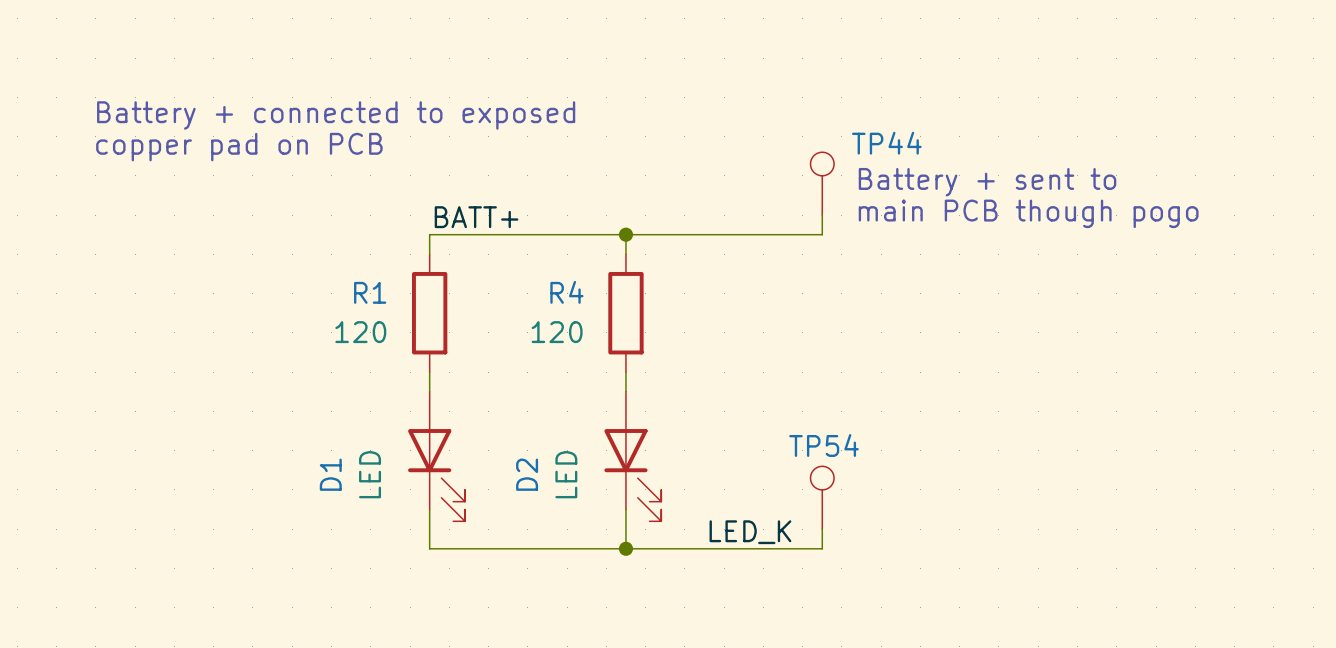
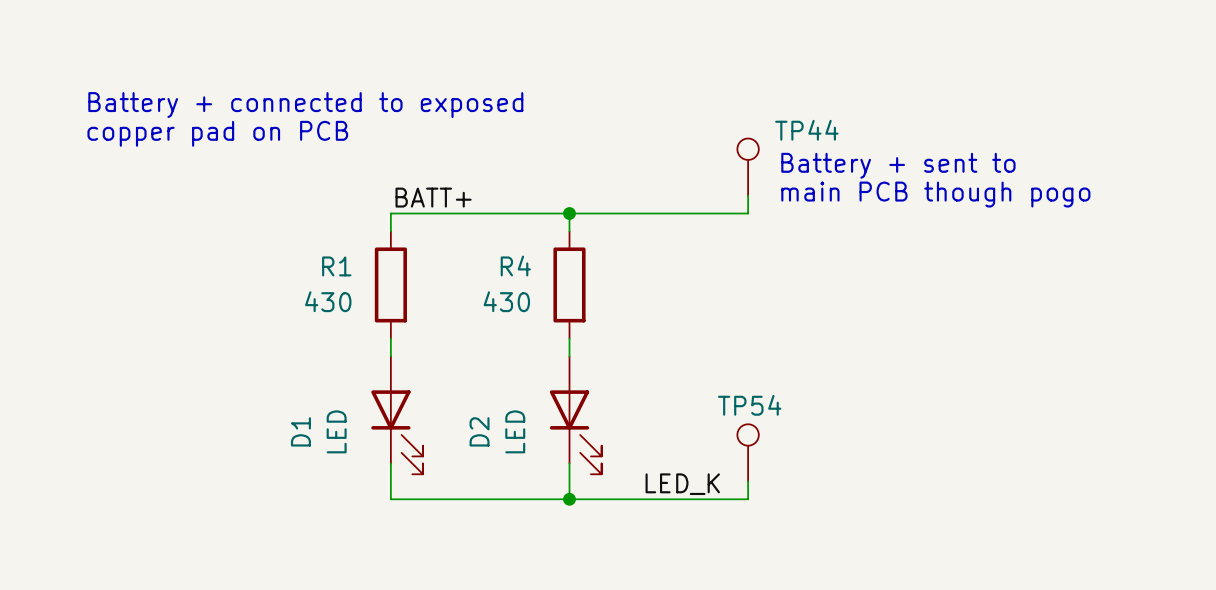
R1 value: 120 (360, 332) -> 430 (328, 301)
R4 value: 120 (557, 332) -> 430 (506, 301)

